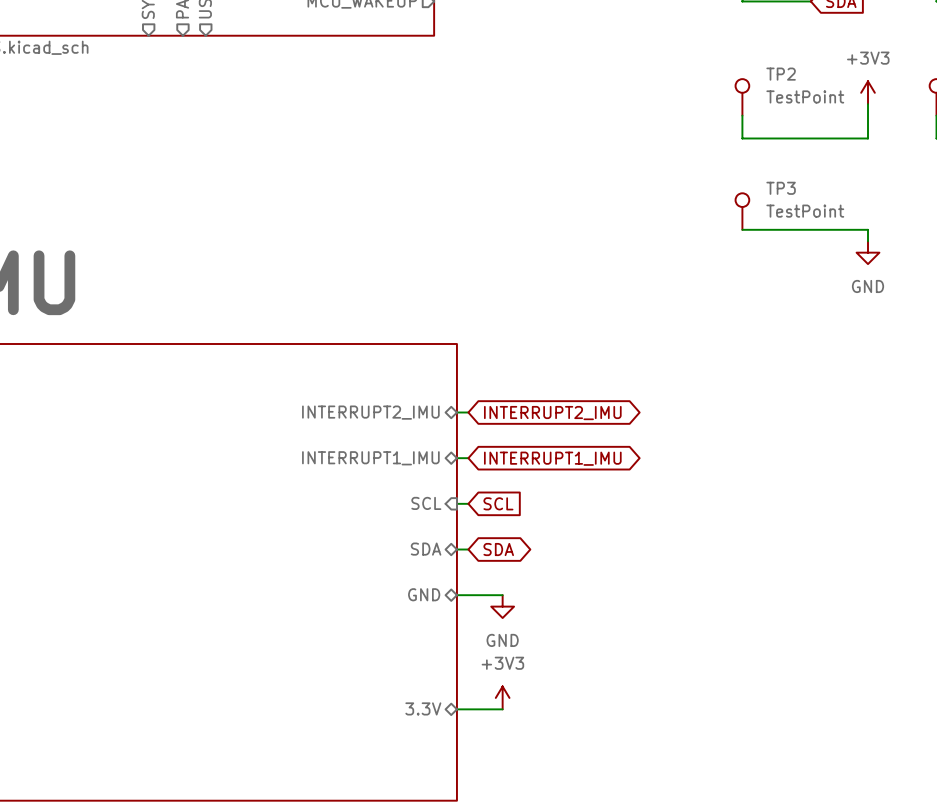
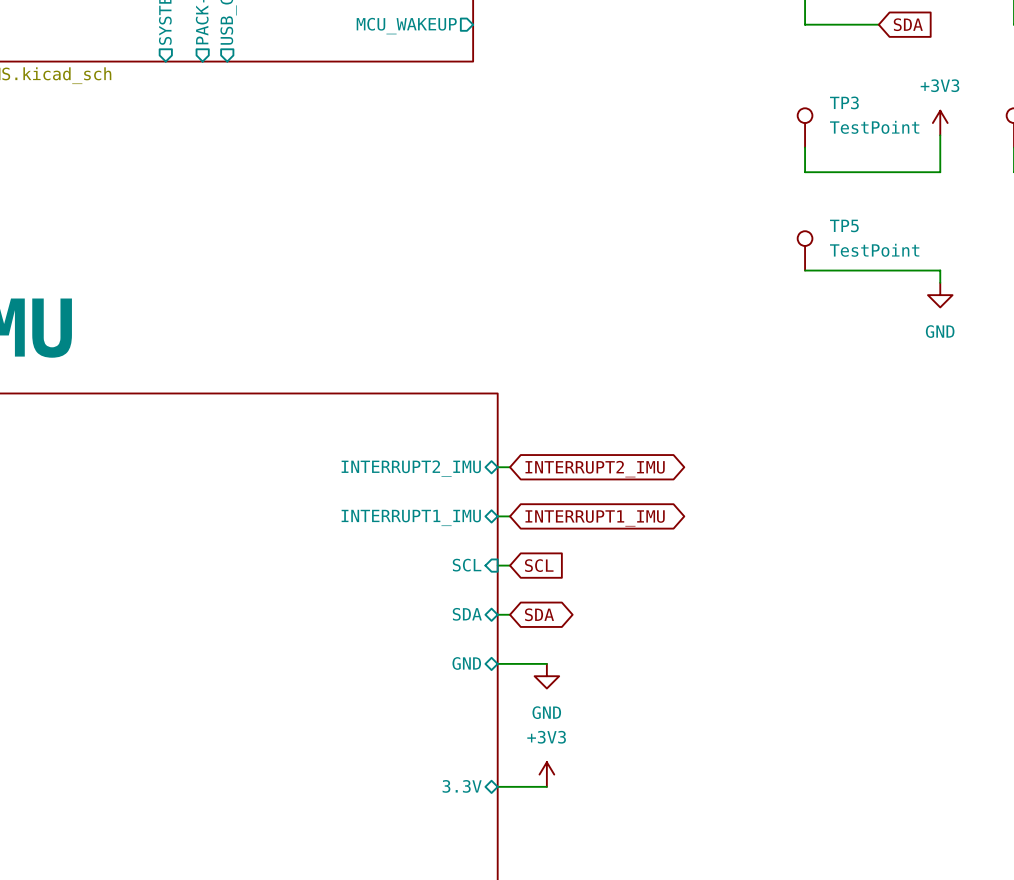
TP2 name: TP2 (781, 74) -> TP3 (844, 102)
TP3 name: TP3 (781, 188) -> TP5 (844, 225)

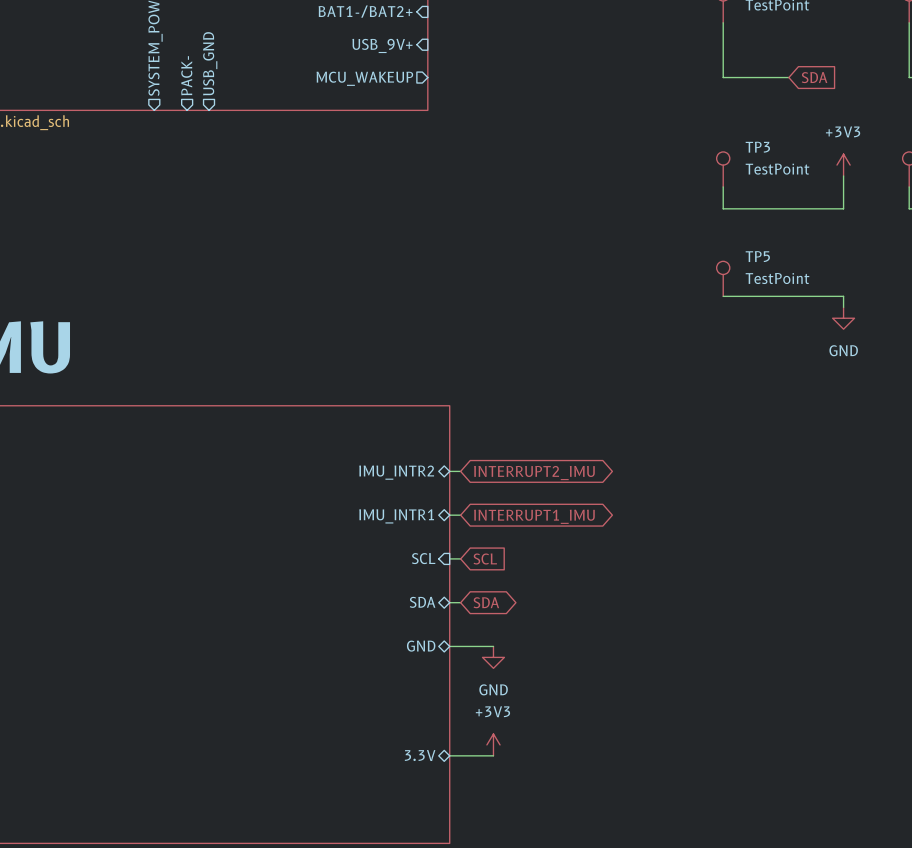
sheet pin: INTERRUPT2_IMU (411, 468) -> IMU_INTR2 (396, 472)
sheet pin: INTERRUPT1_IMU (411, 517) -> IMU_INTR1 (396, 516)

